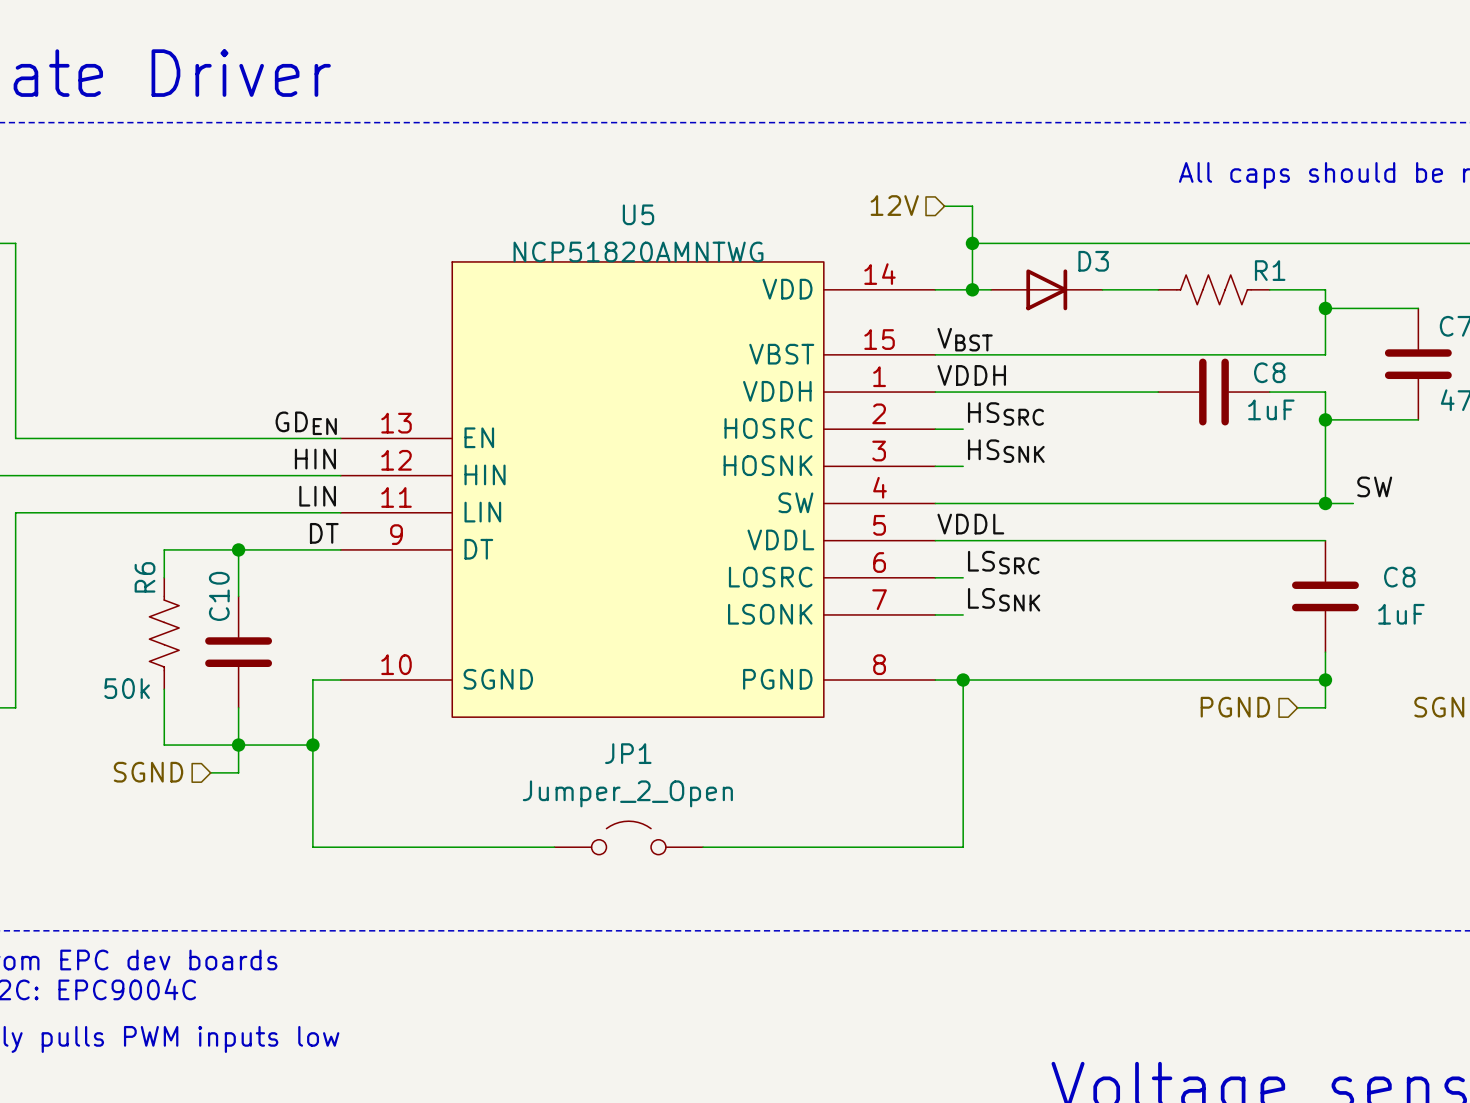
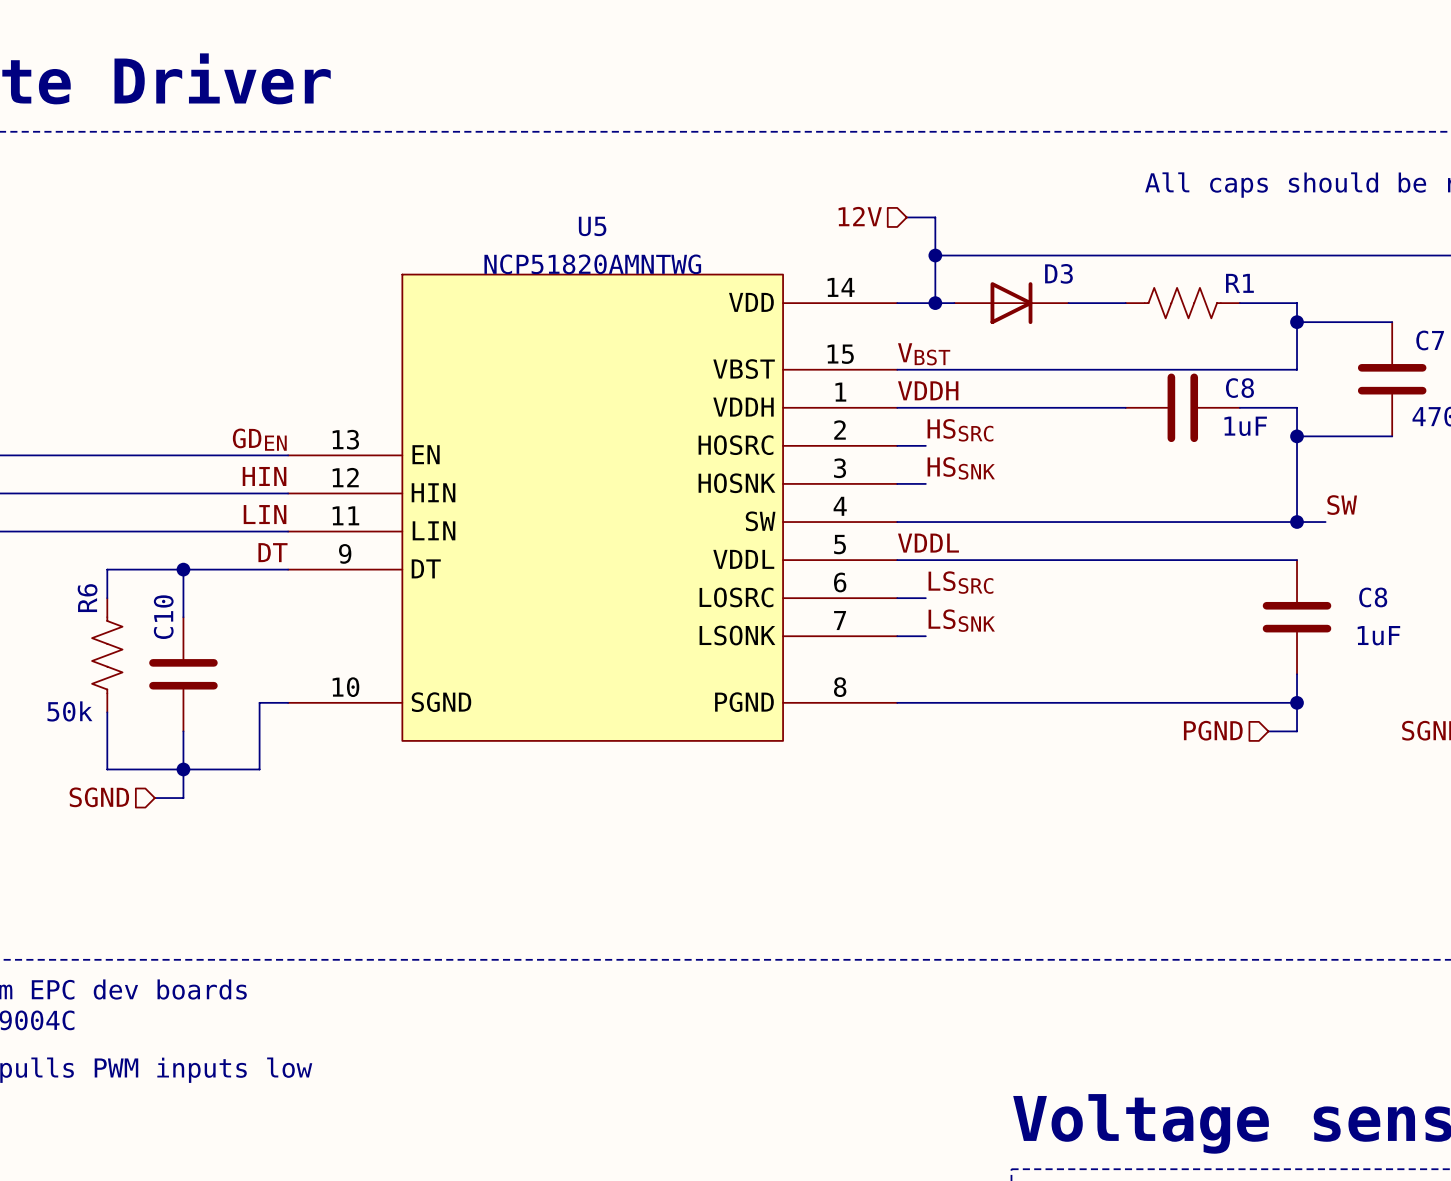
wire: (963, 680) (963, 847) (703, 847) -> none
junction: (963, 680) -> none
wire: (312, 745) (312, 847) (554, 847) -> none
junction: (312, 745) -> none
JP1: Jumper_2_Open (628, 837) -> none

